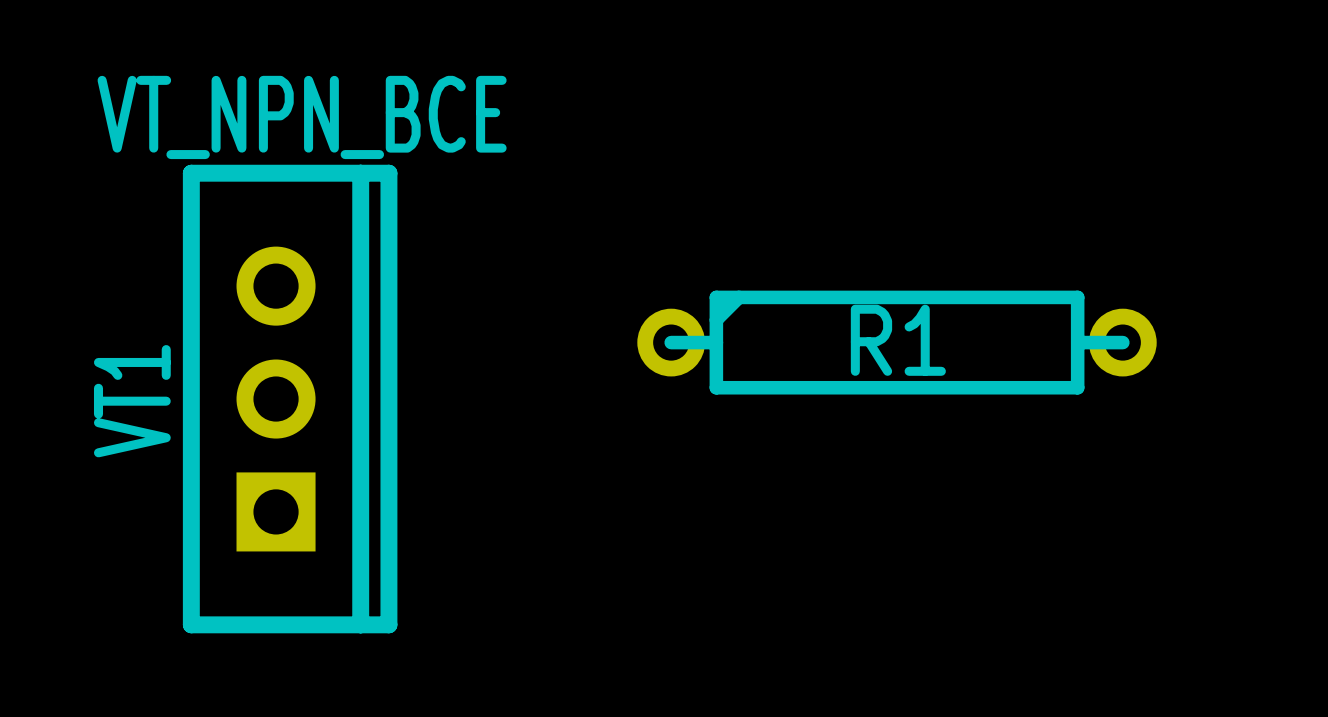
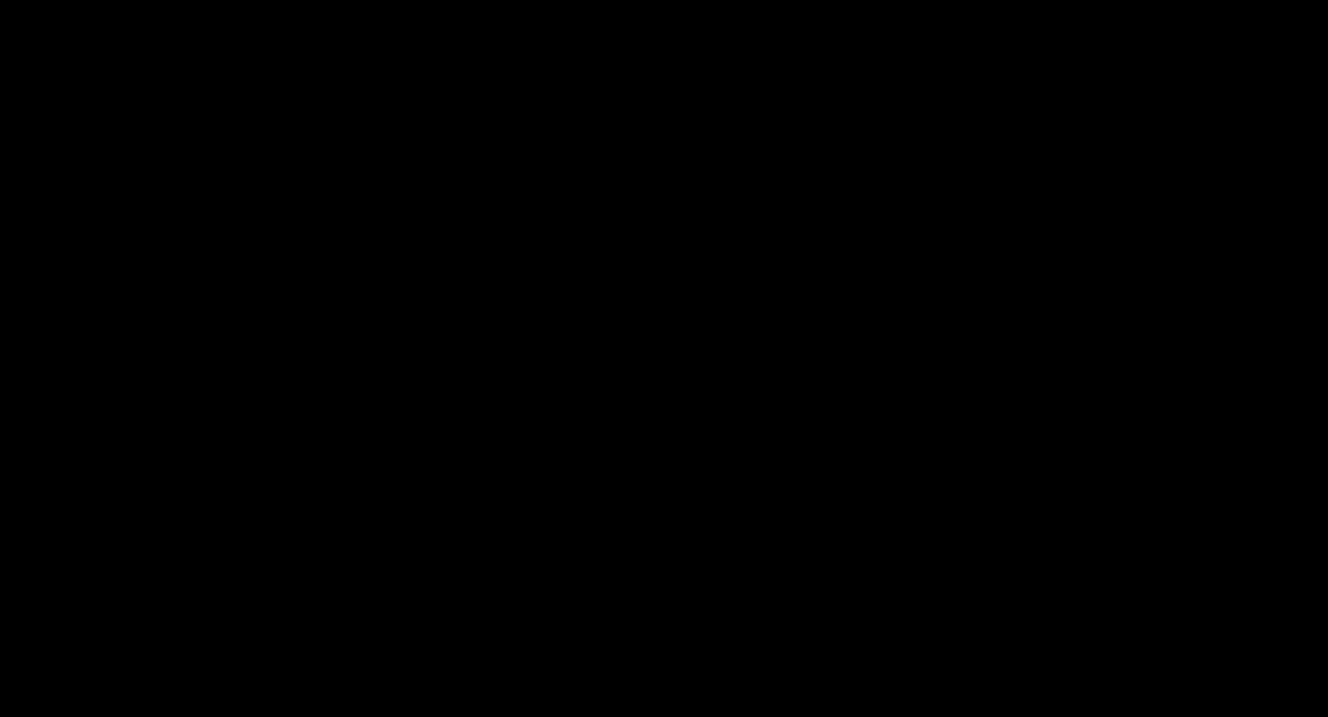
R1: (897, 342) -> none
VT1: VT_NPN_BCE (290, 399) -> none

